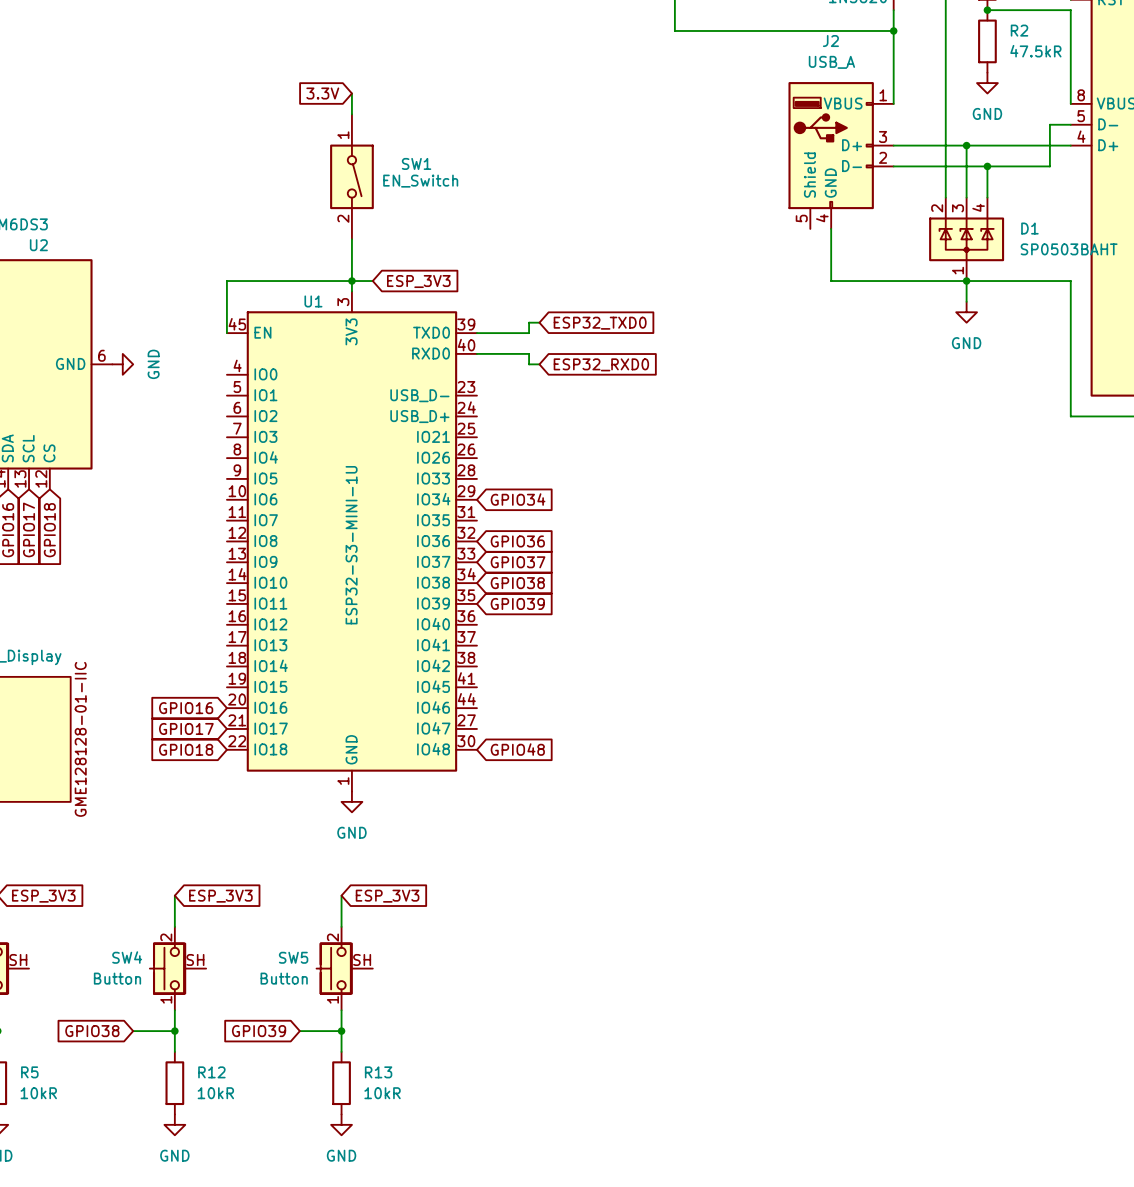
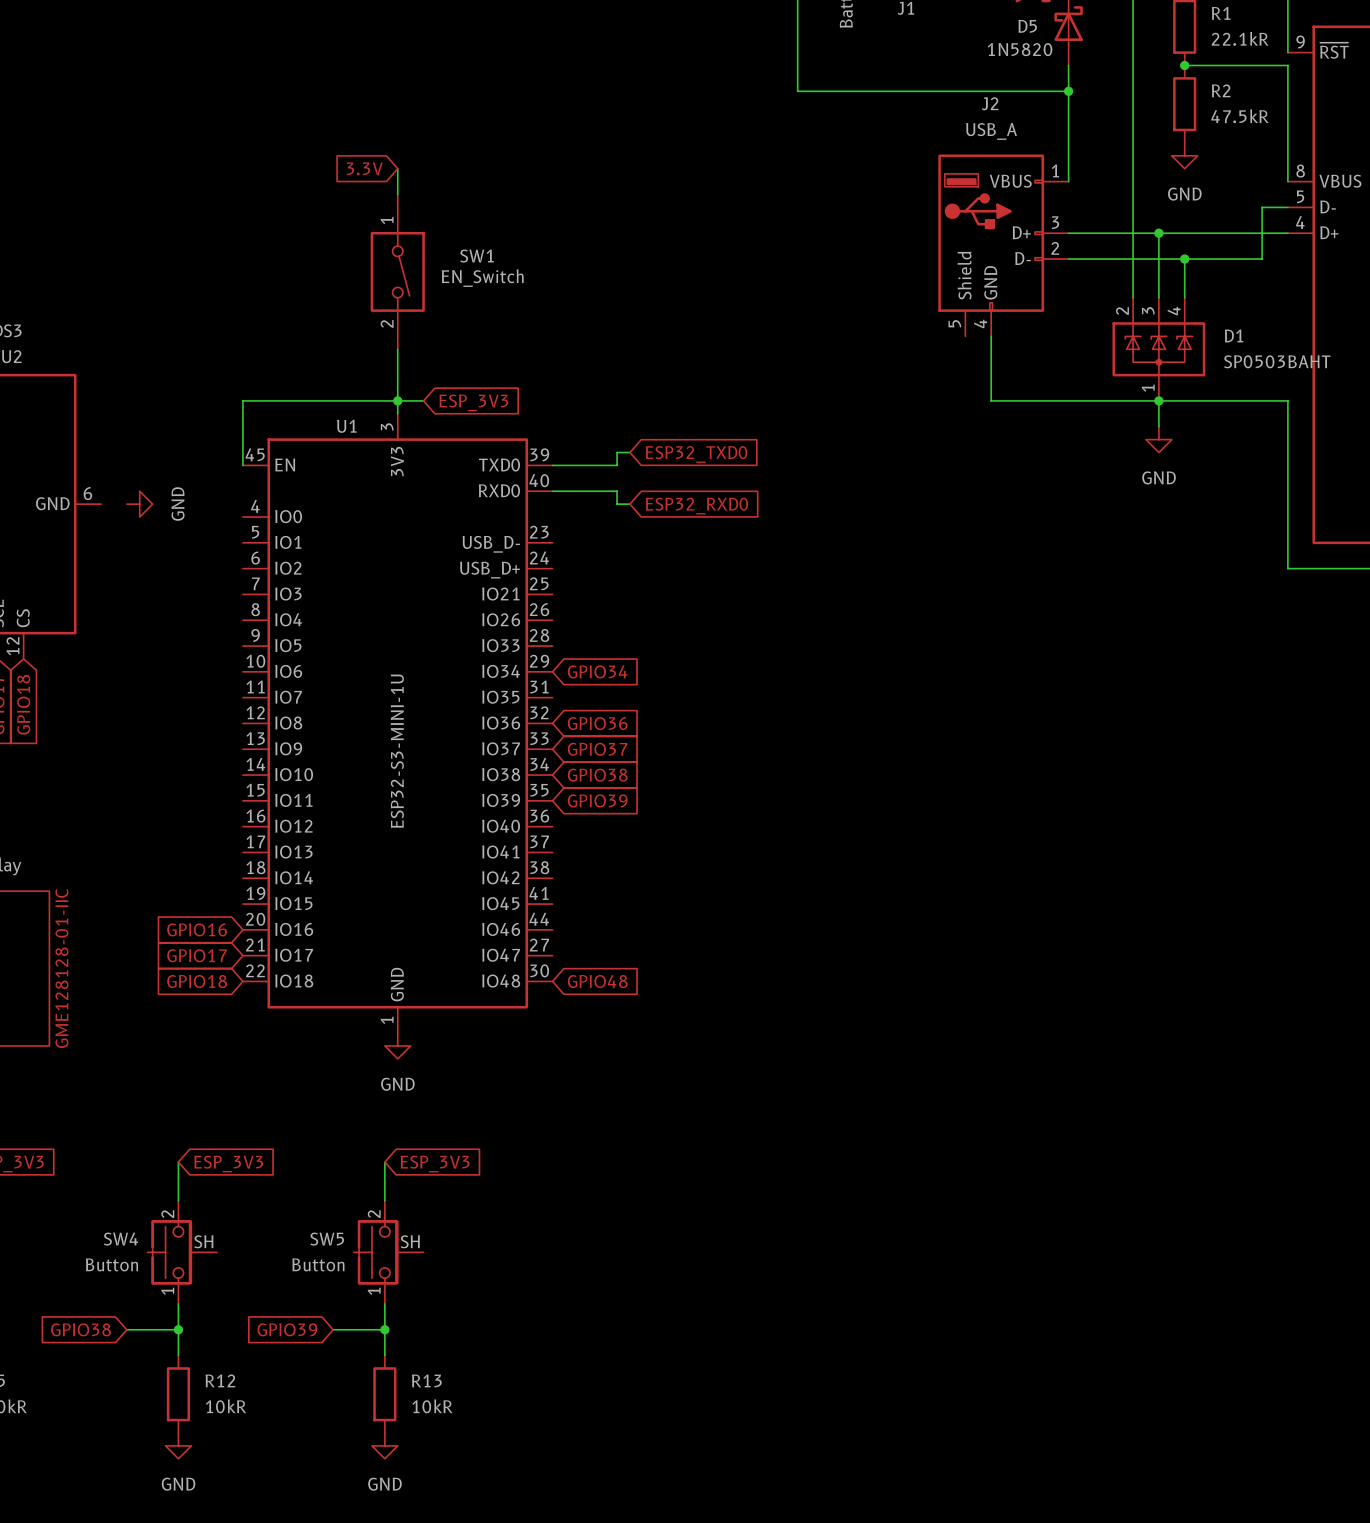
power symbol position: GND (122, 364) -> GND (139, 504)

